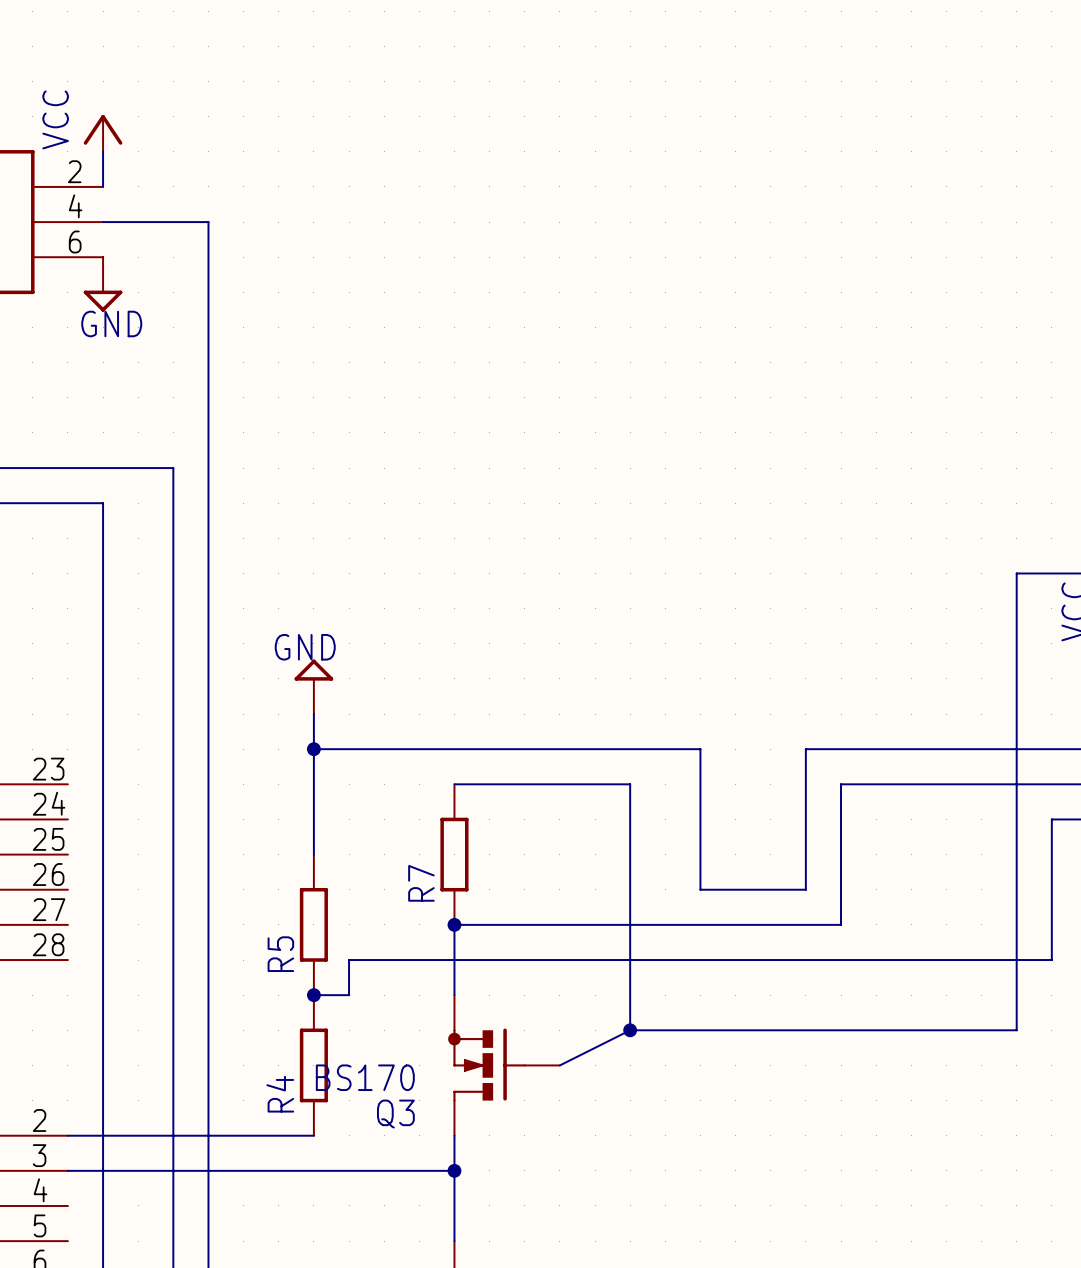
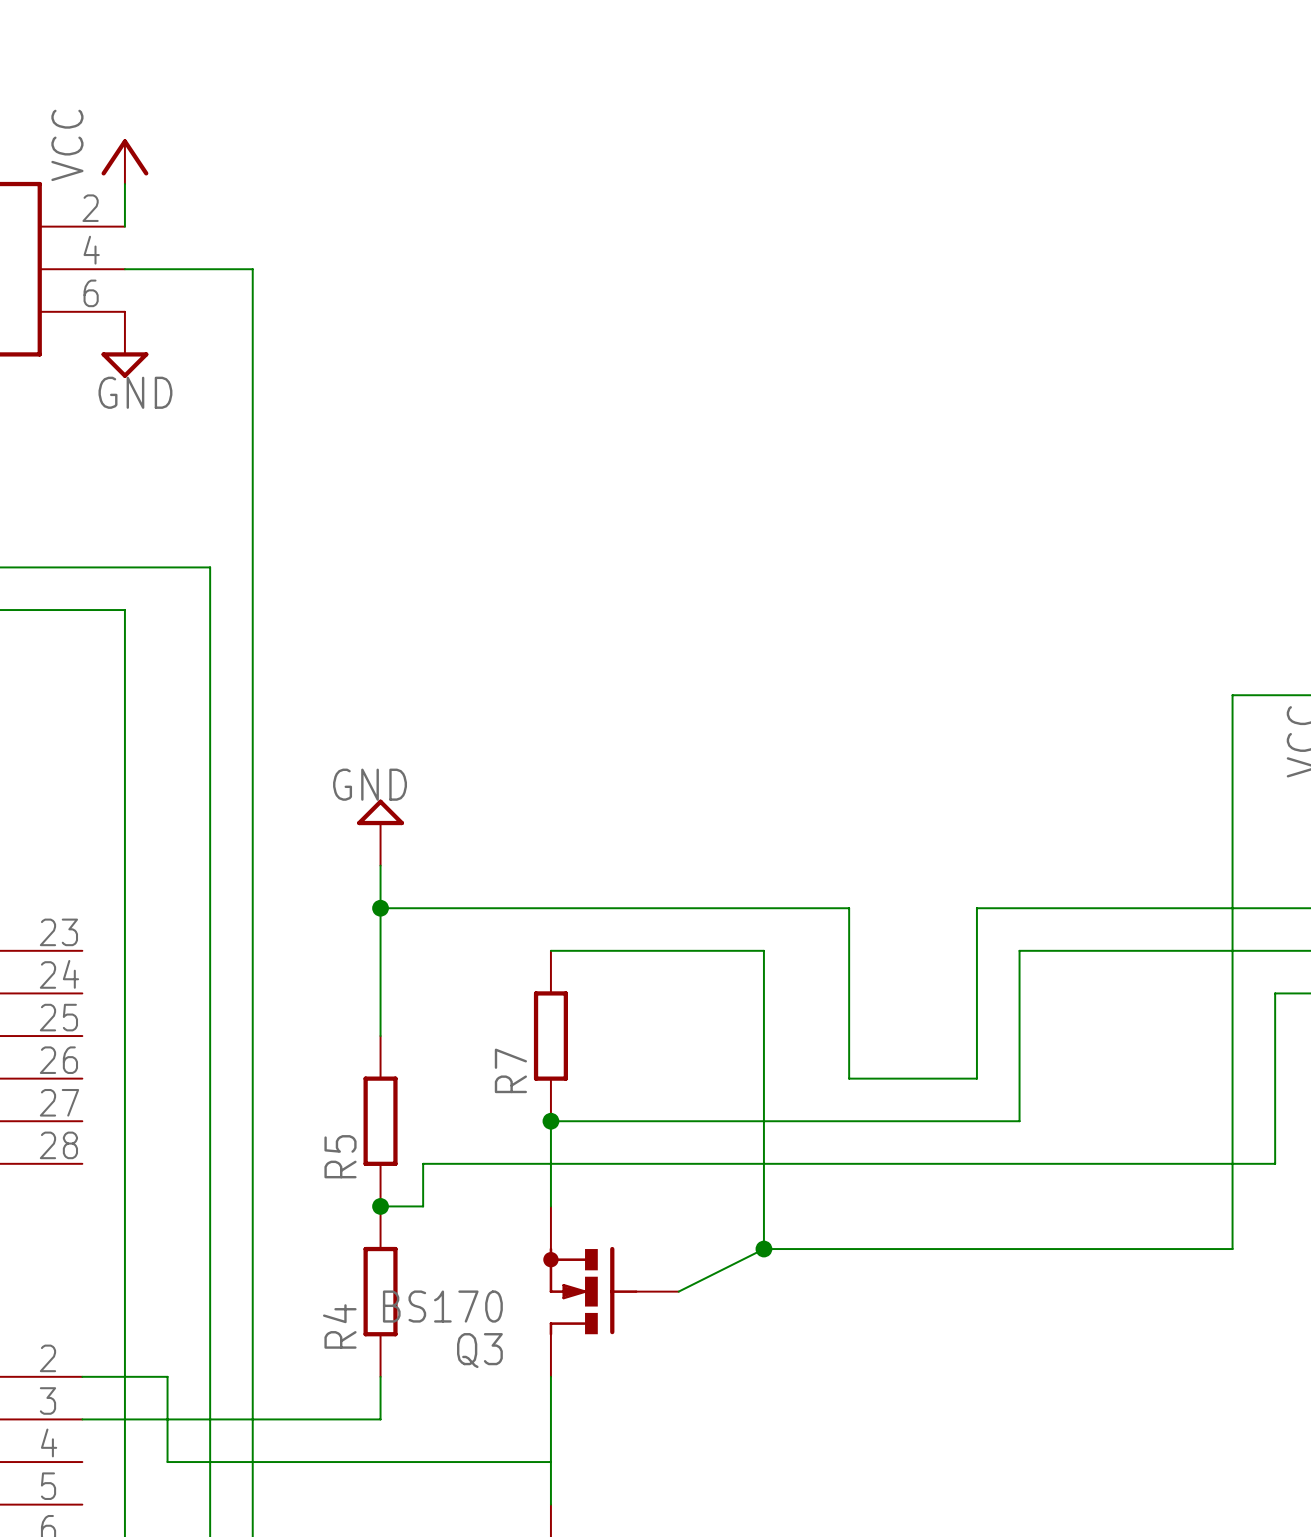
wire: (138, 1135) (313, 1135) -> (167, 1376) (167, 1462) (550, 1462)
wire: (313, 1170) (454, 1170) -> (380, 1419) (380, 1376)
junction: (454, 1170) -> none

